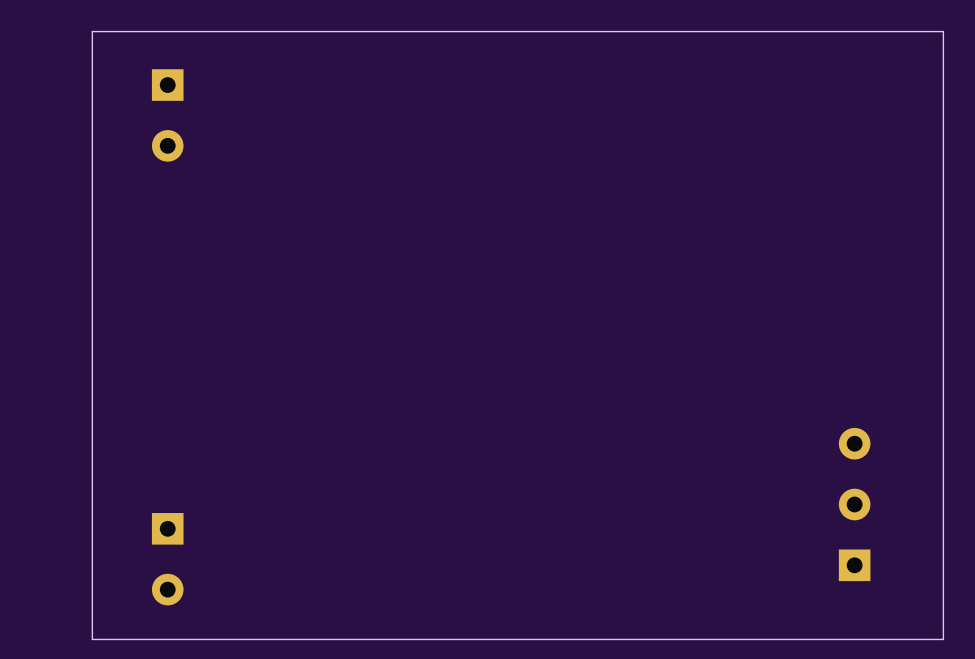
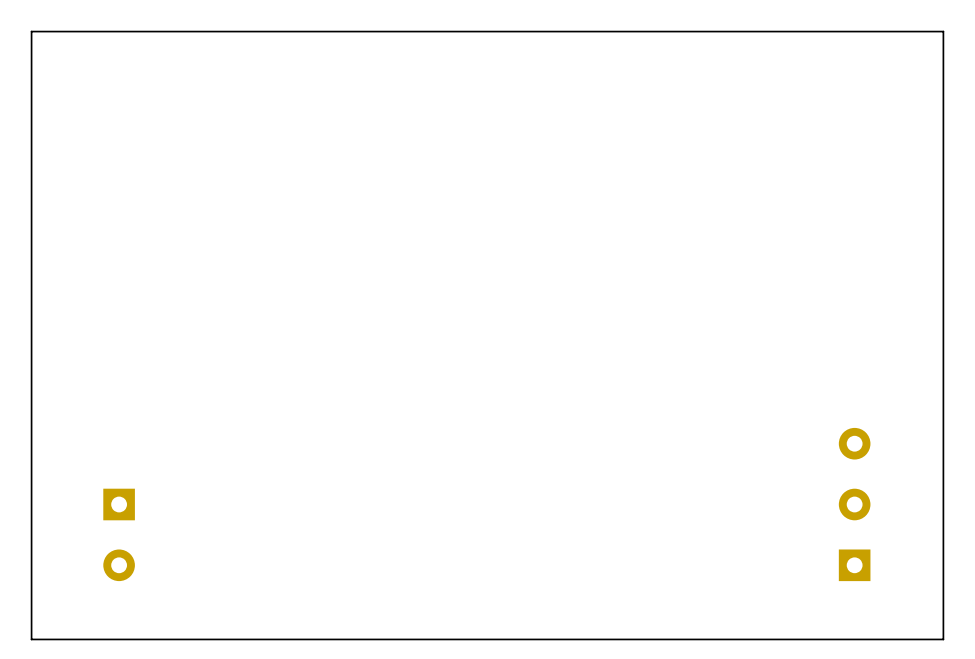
board edge: (92, 31) (92, 639) -> (92, 31) (31, 31) (31, 639) (92, 639)
part: (167, 115) -> none
part position: (167, 559) -> (119, 534)

